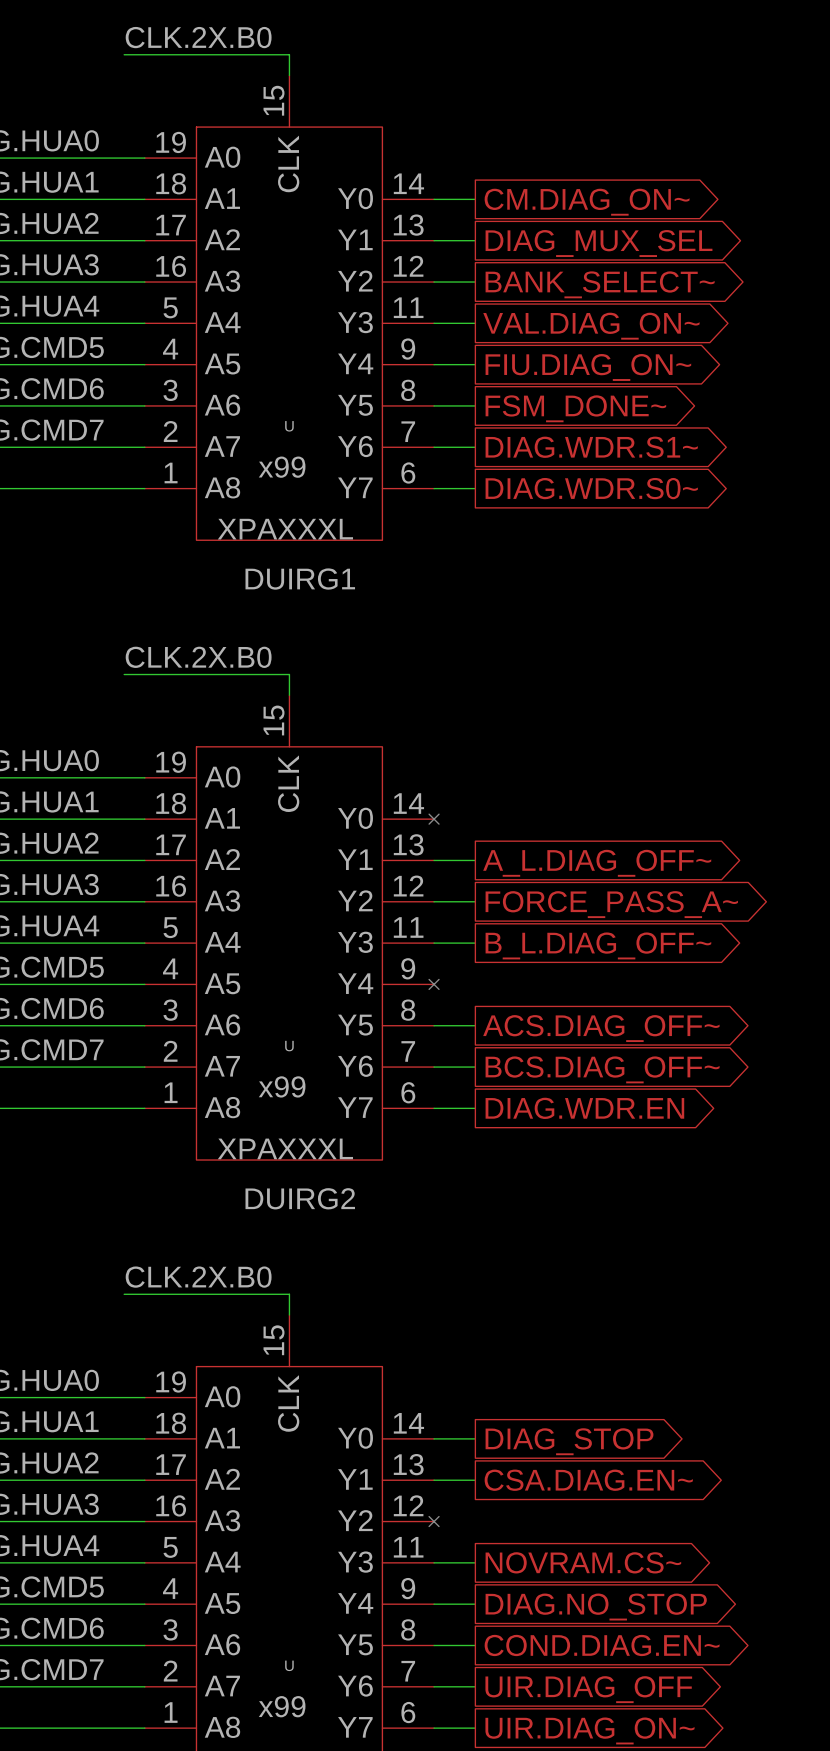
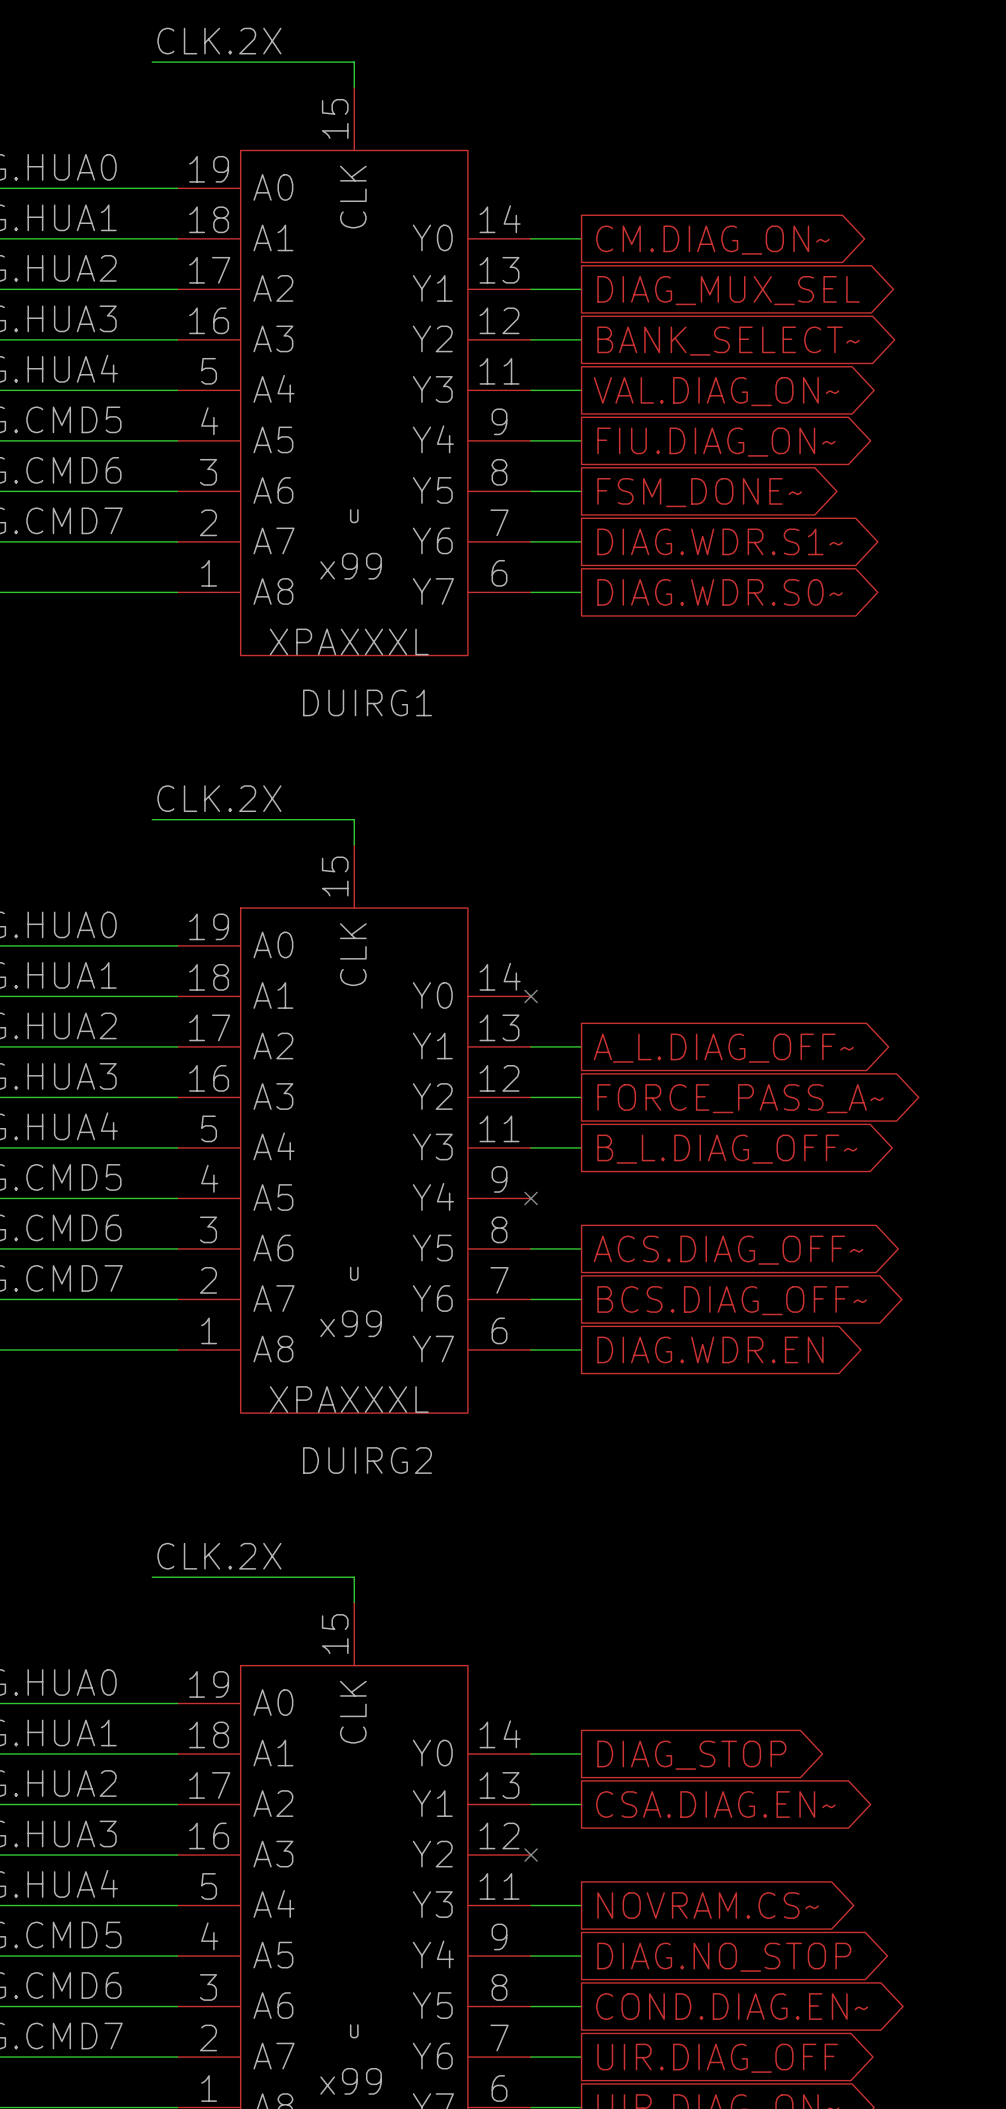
label: CLK.2X.B0 (198, 37) -> CLK.2X (219, 41)
label: CLK.2X.B0 (198, 657) -> CLK.2X (219, 798)
label: CLK.2X.B0 (198, 1277) -> CLK.2X (219, 1556)

